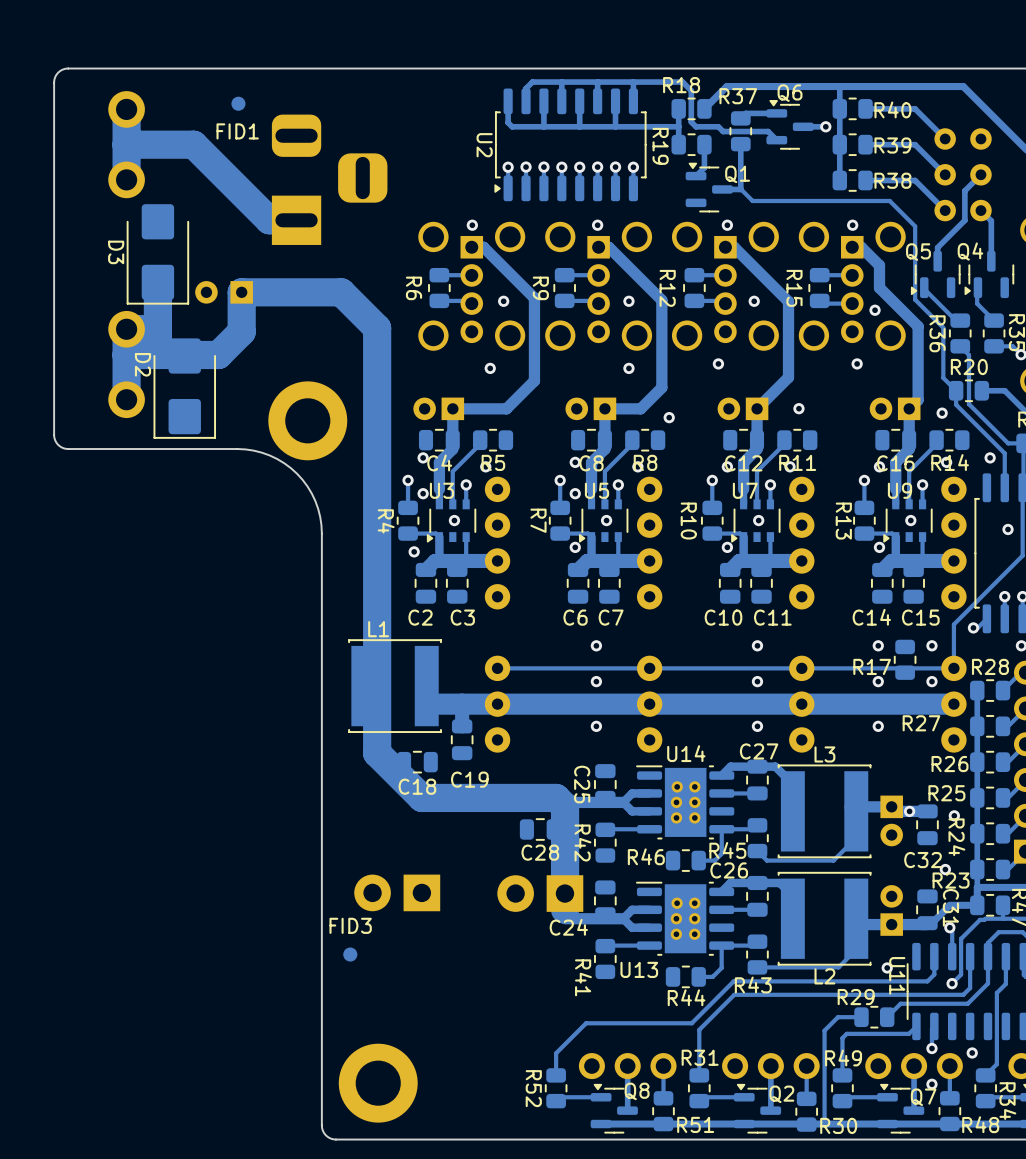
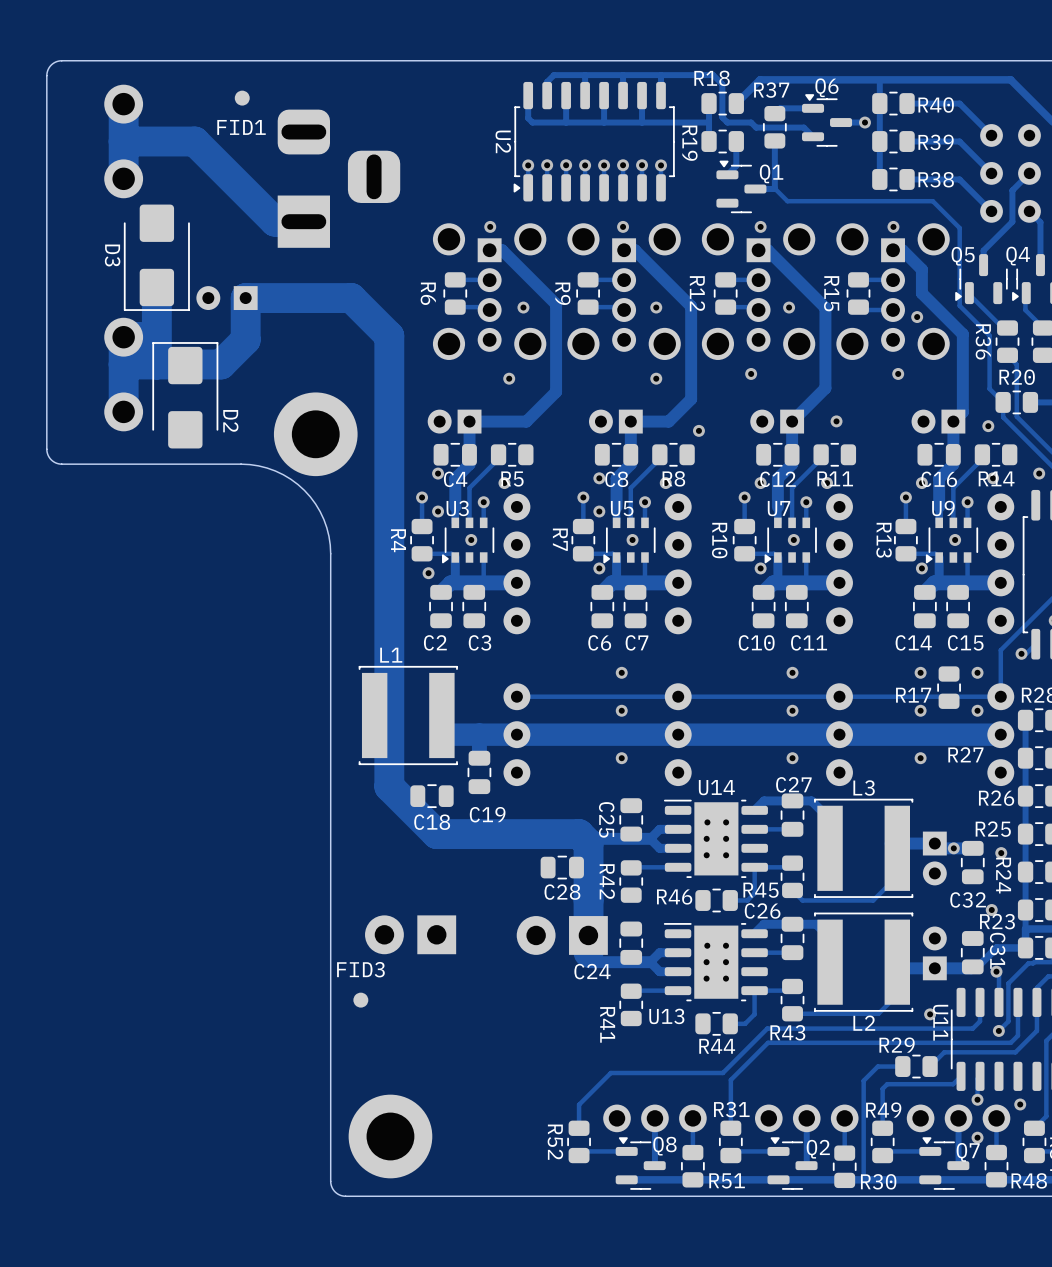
D2 rotation: 0° (184, 388) -> 180° (185, 395)

